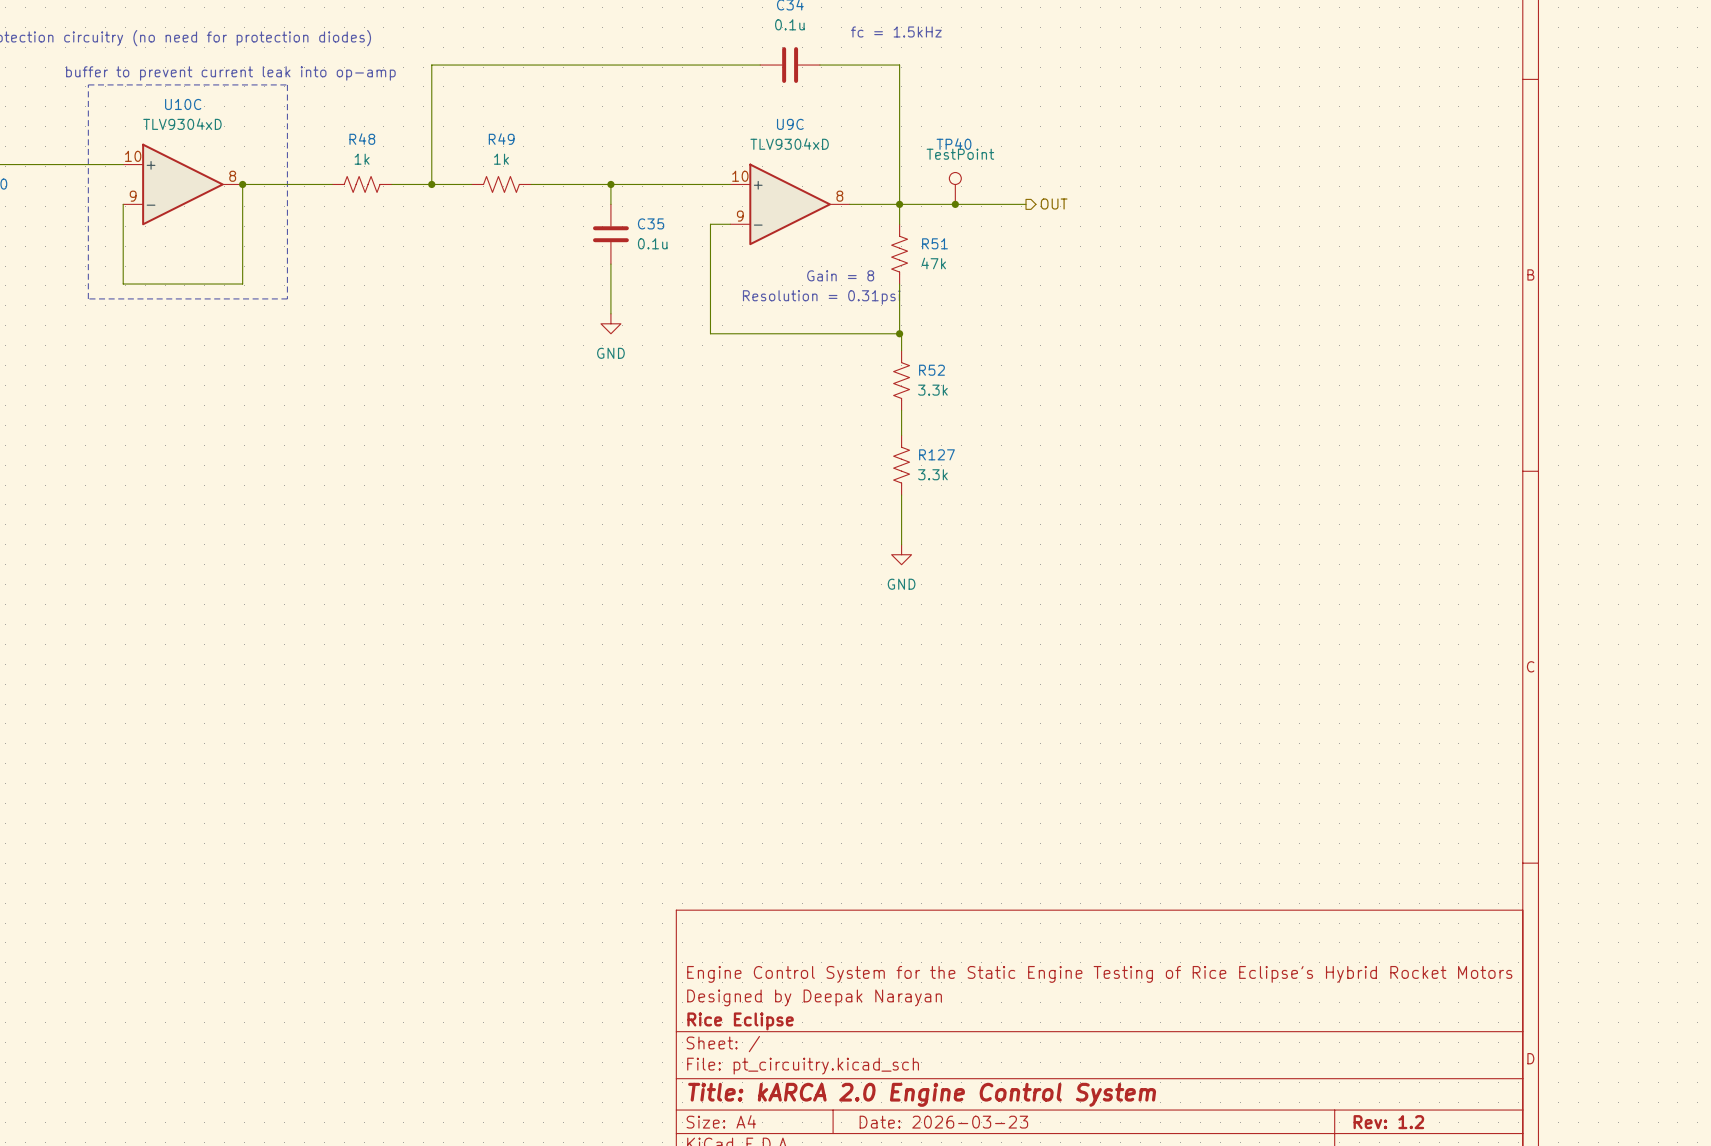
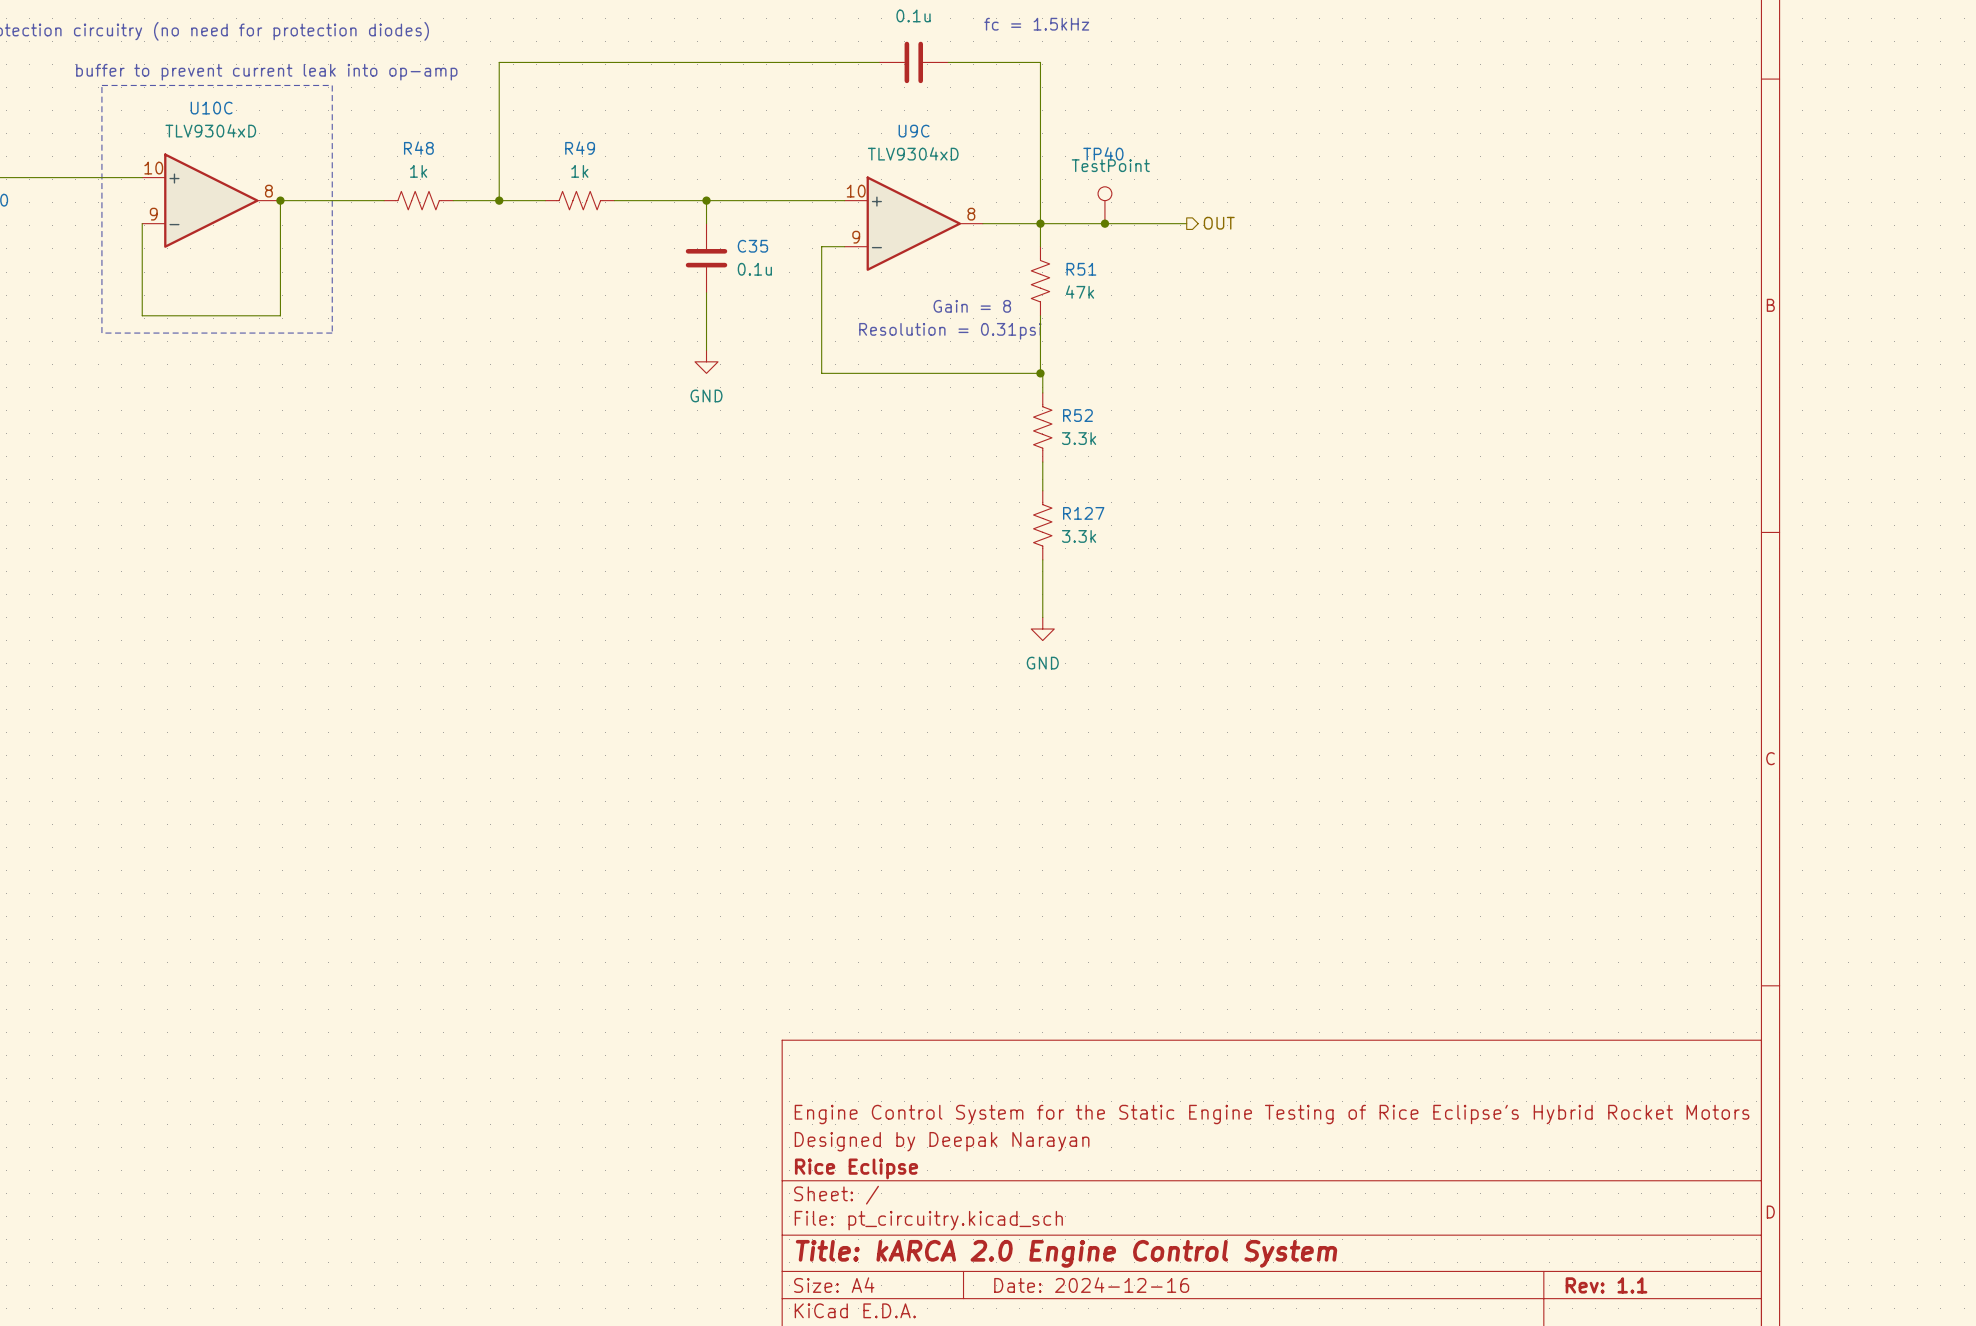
title block: Date: 2026-03-23 (943, 1122) -> Date: 2024-12-16 (1091, 1285)
title block: Rev: 1.2 (1388, 1122) -> Rev: 1.1 (1606, 1285)

